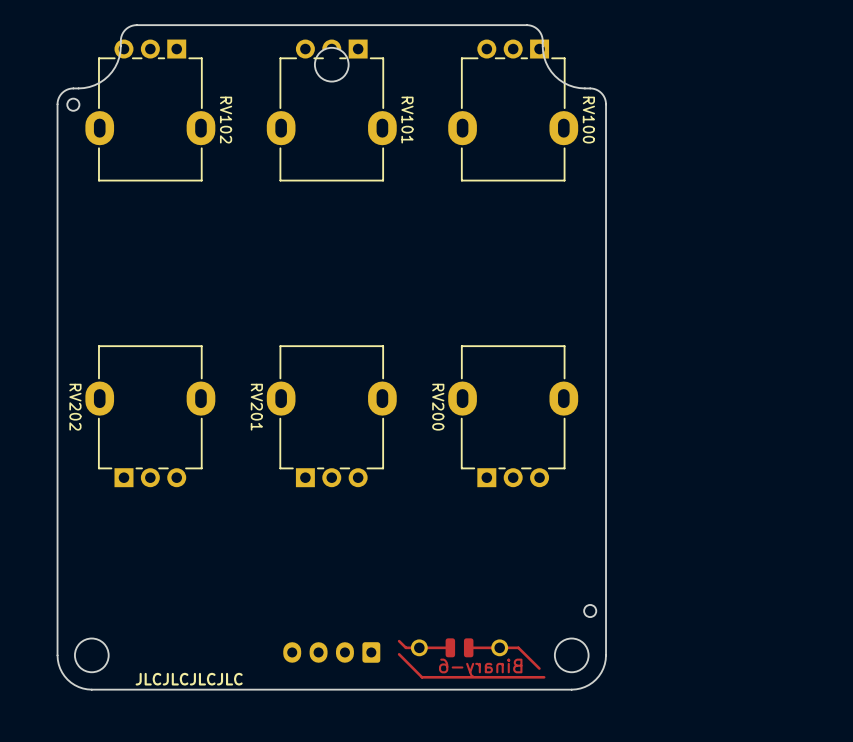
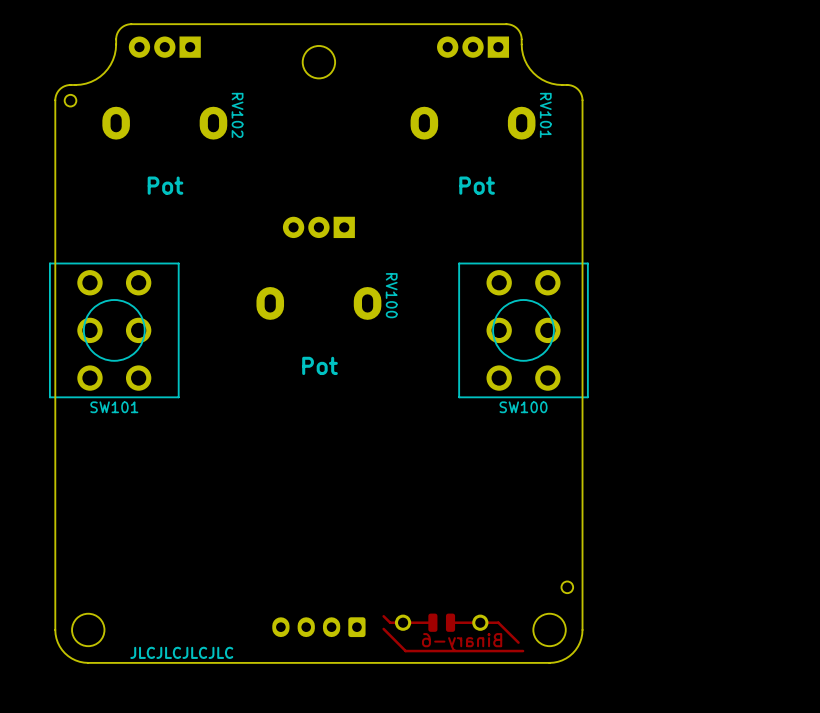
RV102 footprint: [85, 39, 216, 182] -> [102, 36, 228, 140]
RV101 footprint: [266, 39, 397, 182] -> [410, 36, 536, 140]
RV100 footprint: [448, 39, 579, 182] -> [256, 216, 382, 320]
text: none -> Pot (165, 185)
text: none -> Pot (477, 185)
SW101: none -> (114, 330)
SW100: none -> (523, 330)
text: none -> Pot (320, 365)
RV202: (150, 416) -> none
RV201: (331, 416) -> none
RV200: (513, 416) -> none

